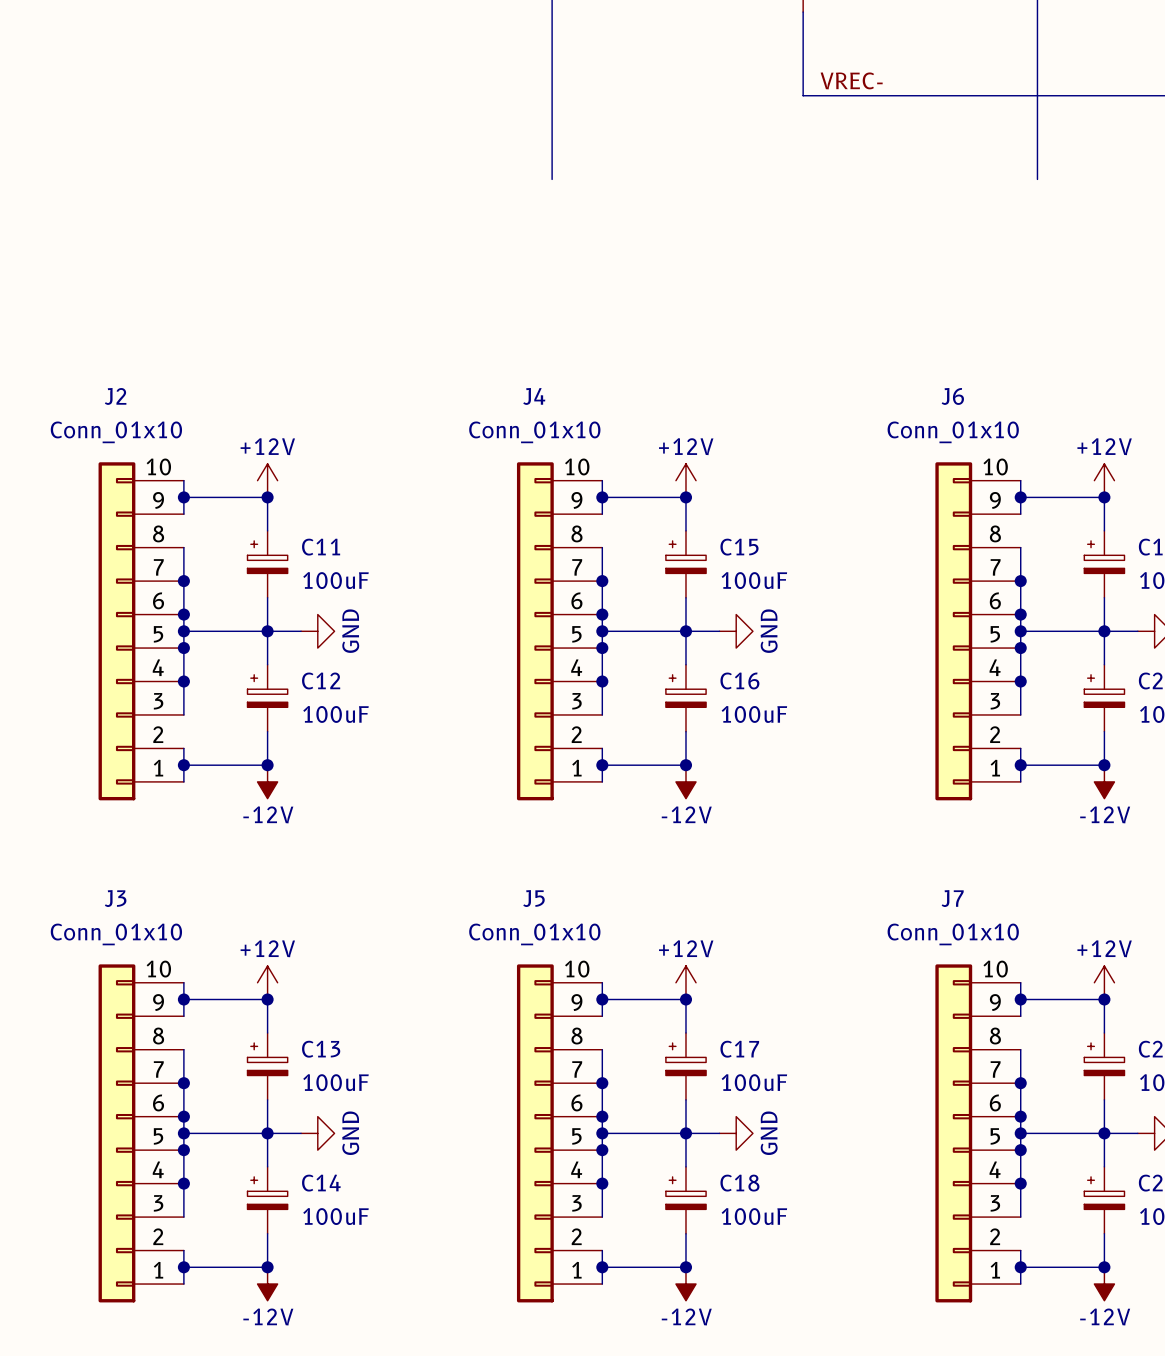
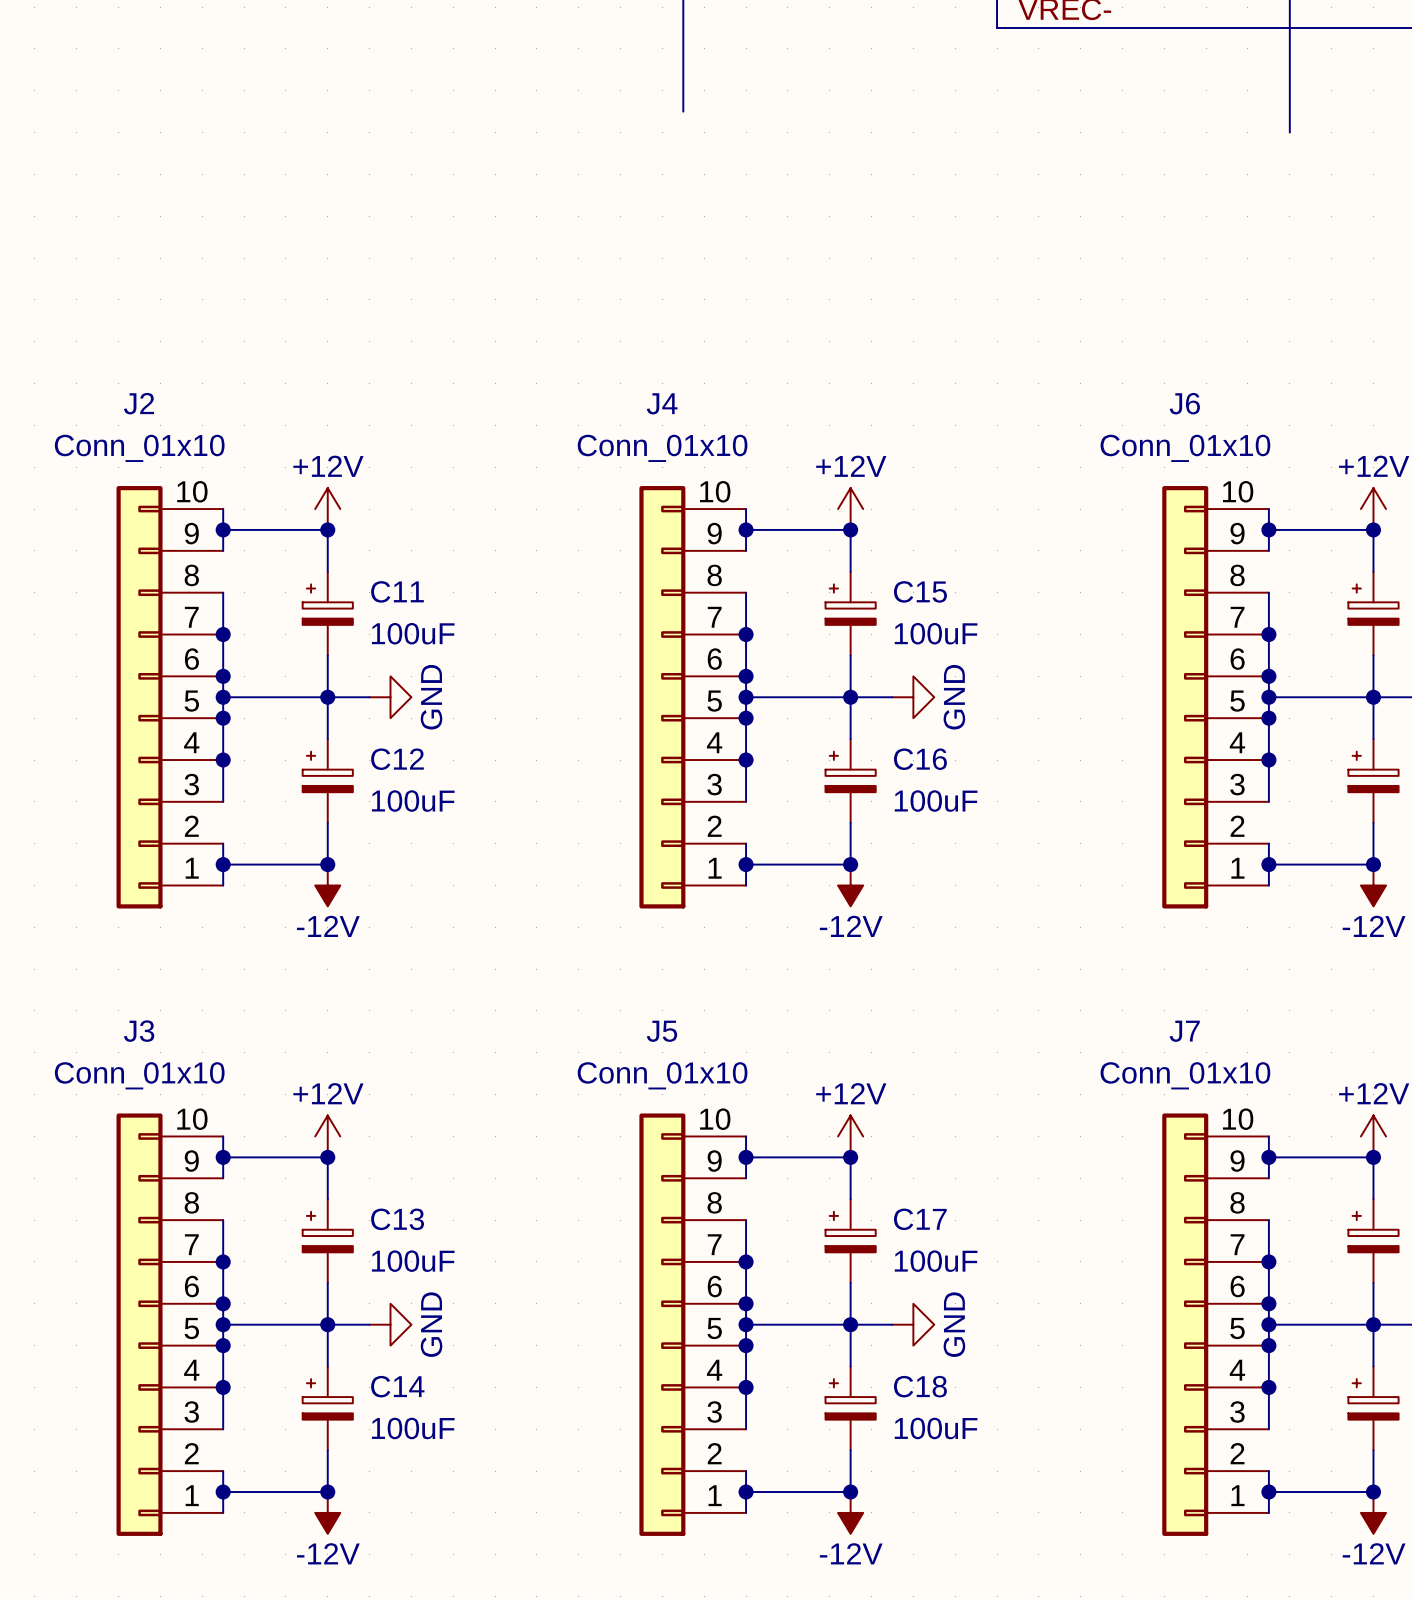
line: (552, 162) (552, 179) -> none

